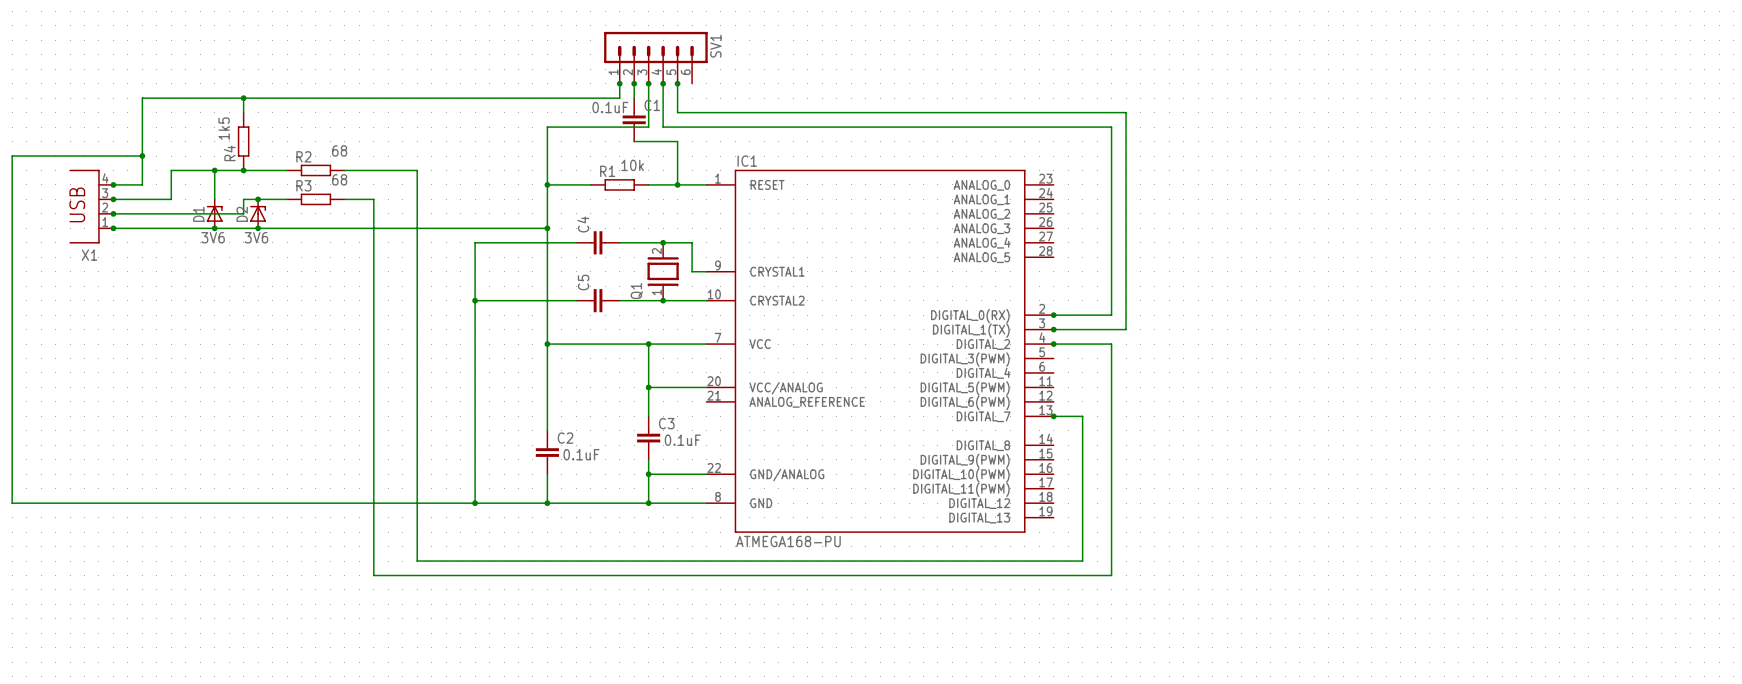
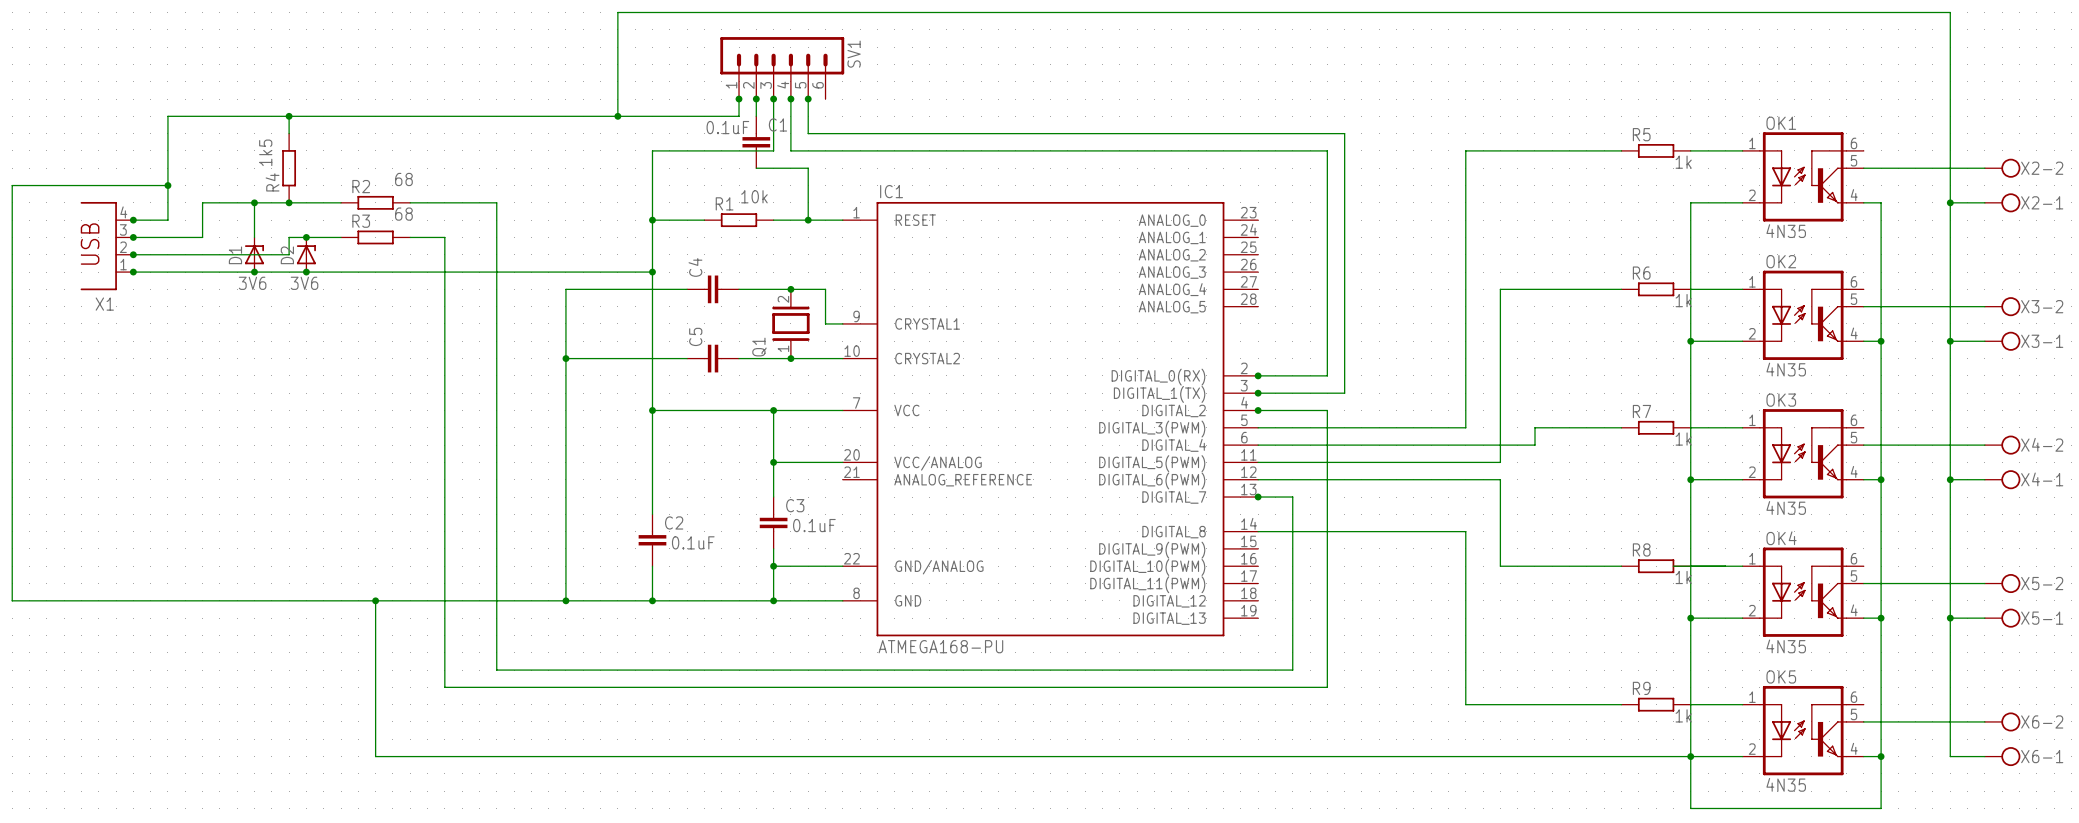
wire: none -> (617, 116) (617, 12) (1950, 12) (1950, 756) (1984, 756)
junction: none -> (617, 116)
wire: none -> (1621, 150) (1465, 150) (1465, 427) (1258, 427)
R5: none -> (1656, 150)
wire: none -> (1690, 150) (1742, 150)
text: none -> 1k (1683, 162)
wire: none -> (1863, 168) (1984, 168)
X2-2: none -> (2002, 168)
OK1: none -> 4N35 (1803, 176)
wire: none -> (1742, 202) (1690, 202) (1690, 808) (1881, 808) (1881, 202) (1863, 202)
wire: none -> (1950, 202) (1984, 202)
junction: none -> (1950, 202)
X2-1: none -> (2002, 202)
wire: none -> (1621, 289) (1500, 289) (1500, 462) (1258, 462)
R6: none -> (1656, 289)
wire: none -> (1690, 289) (1742, 289)
text: none -> 1k (1683, 300)
wire: none -> (1863, 306) (1984, 306)
X3-2: none -> (2002, 306)
OK2: none -> 4N35 (1803, 315)
wire: none -> (1690, 341) (1742, 341)
junction: none -> (1690, 341)
wire: none -> (1863, 341) (1881, 341)
junction: none -> (1881, 341)
wire: none -> (1950, 341) (1984, 341)
junction: none -> (1950, 341)
X3-1: none -> (2002, 341)
wire: none -> (1621, 427) (1534, 427) (1534, 445) (1258, 445)
R7: none -> (1656, 427)
wire: none -> (1690, 427) (1742, 427)
text: none -> 1k (1683, 439)
wire: none -> (1863, 445) (1984, 445)
X4-2: none -> (2002, 445)
OK3: none -> 4N35 (1803, 453)
wire: none -> (1258, 479) (1500, 479) (1500, 566) (1621, 566)
wire: none -> (1690, 479) (1742, 479)
junction: none -> (1690, 479)
wire: none -> (1863, 479) (1881, 479)
junction: none -> (1881, 479)
wire: none -> (1950, 479) (1984, 479)
junction: none -> (1950, 479)
X4-1: none -> (2002, 479)
wire: none -> (1258, 531) (1465, 531) (1465, 704) (1621, 704)
R8: none -> (1656, 566)
wire: none -> (1673, 566) (1742, 566)
text: none -> 1k (1683, 577)
wire: none -> (1863, 583) (1984, 583)
X5-2: none -> (2002, 583)
OK4: none -> 4N35 (1803, 592)
wire: none -> (375, 600) (375, 756) (1742, 756)
junction: none -> (375, 600)
wire: none -> (1690, 618) (1742, 618)
junction: none -> (1690, 618)
wire: none -> (1863, 618) (1881, 618)
junction: none -> (1881, 618)
wire: none -> (1950, 618) (1984, 618)
junction: none -> (1950, 618)
X5-1: none -> (2002, 618)
R9: none -> (1656, 704)
wire: none -> (1690, 704) (1742, 704)
text: none -> 1k (1683, 715)
wire: none -> (1863, 721) (1984, 721)
X6-2: none -> (2002, 721)
OK5: none -> 4N35 (1803, 730)
junction: none -> (1690, 756)
wire: none -> (1863, 756) (1881, 756)
junction: none -> (1881, 756)
X6-1: none -> (2002, 756)

